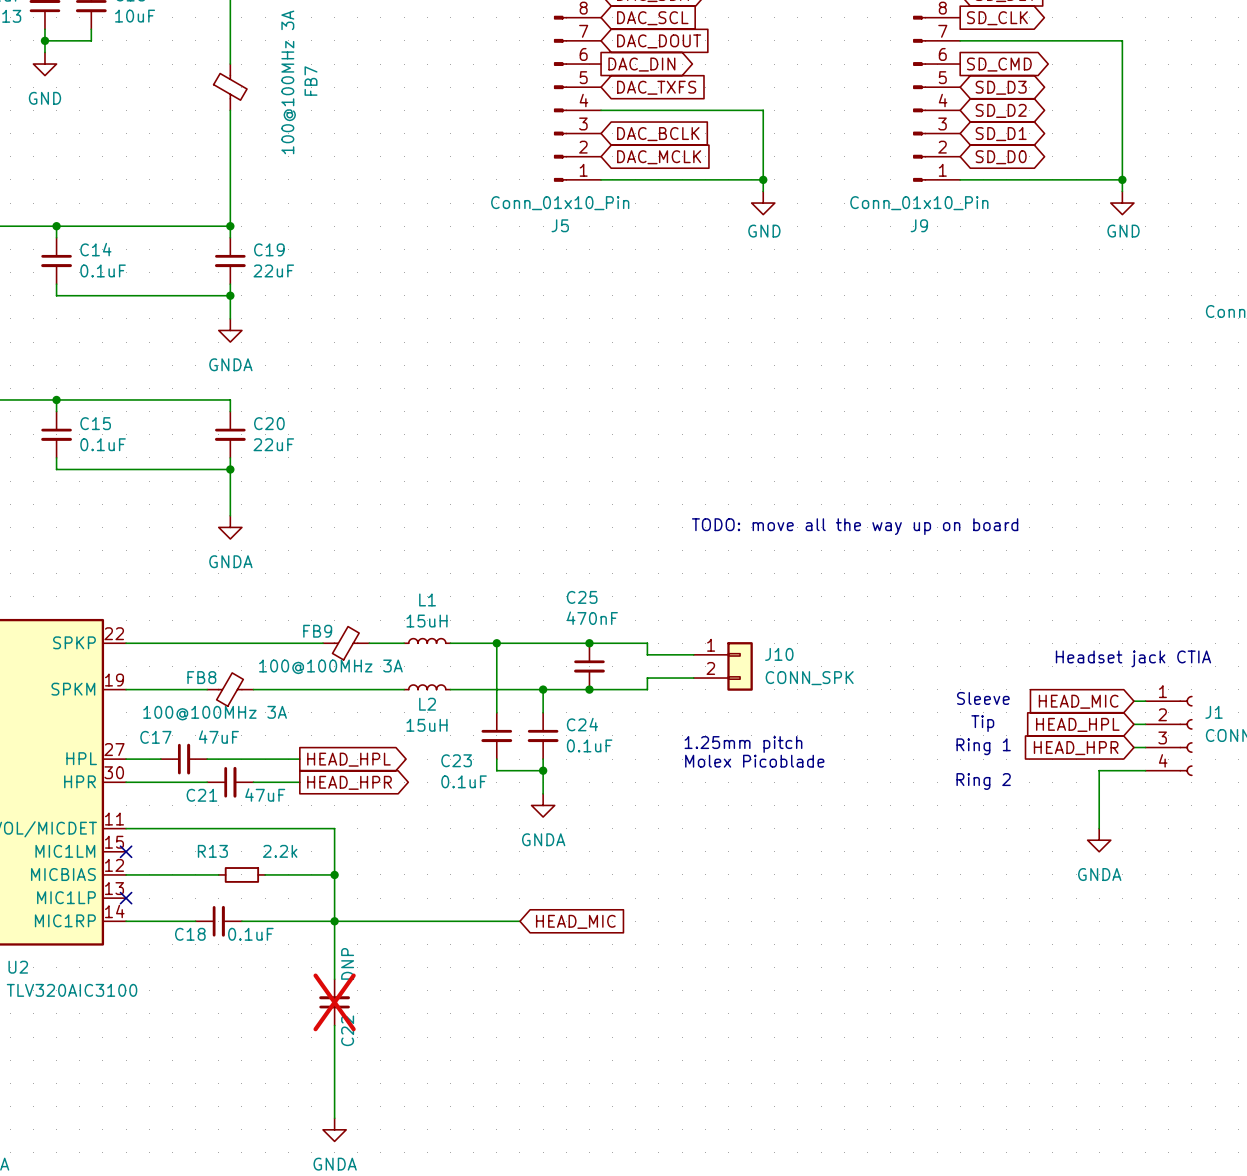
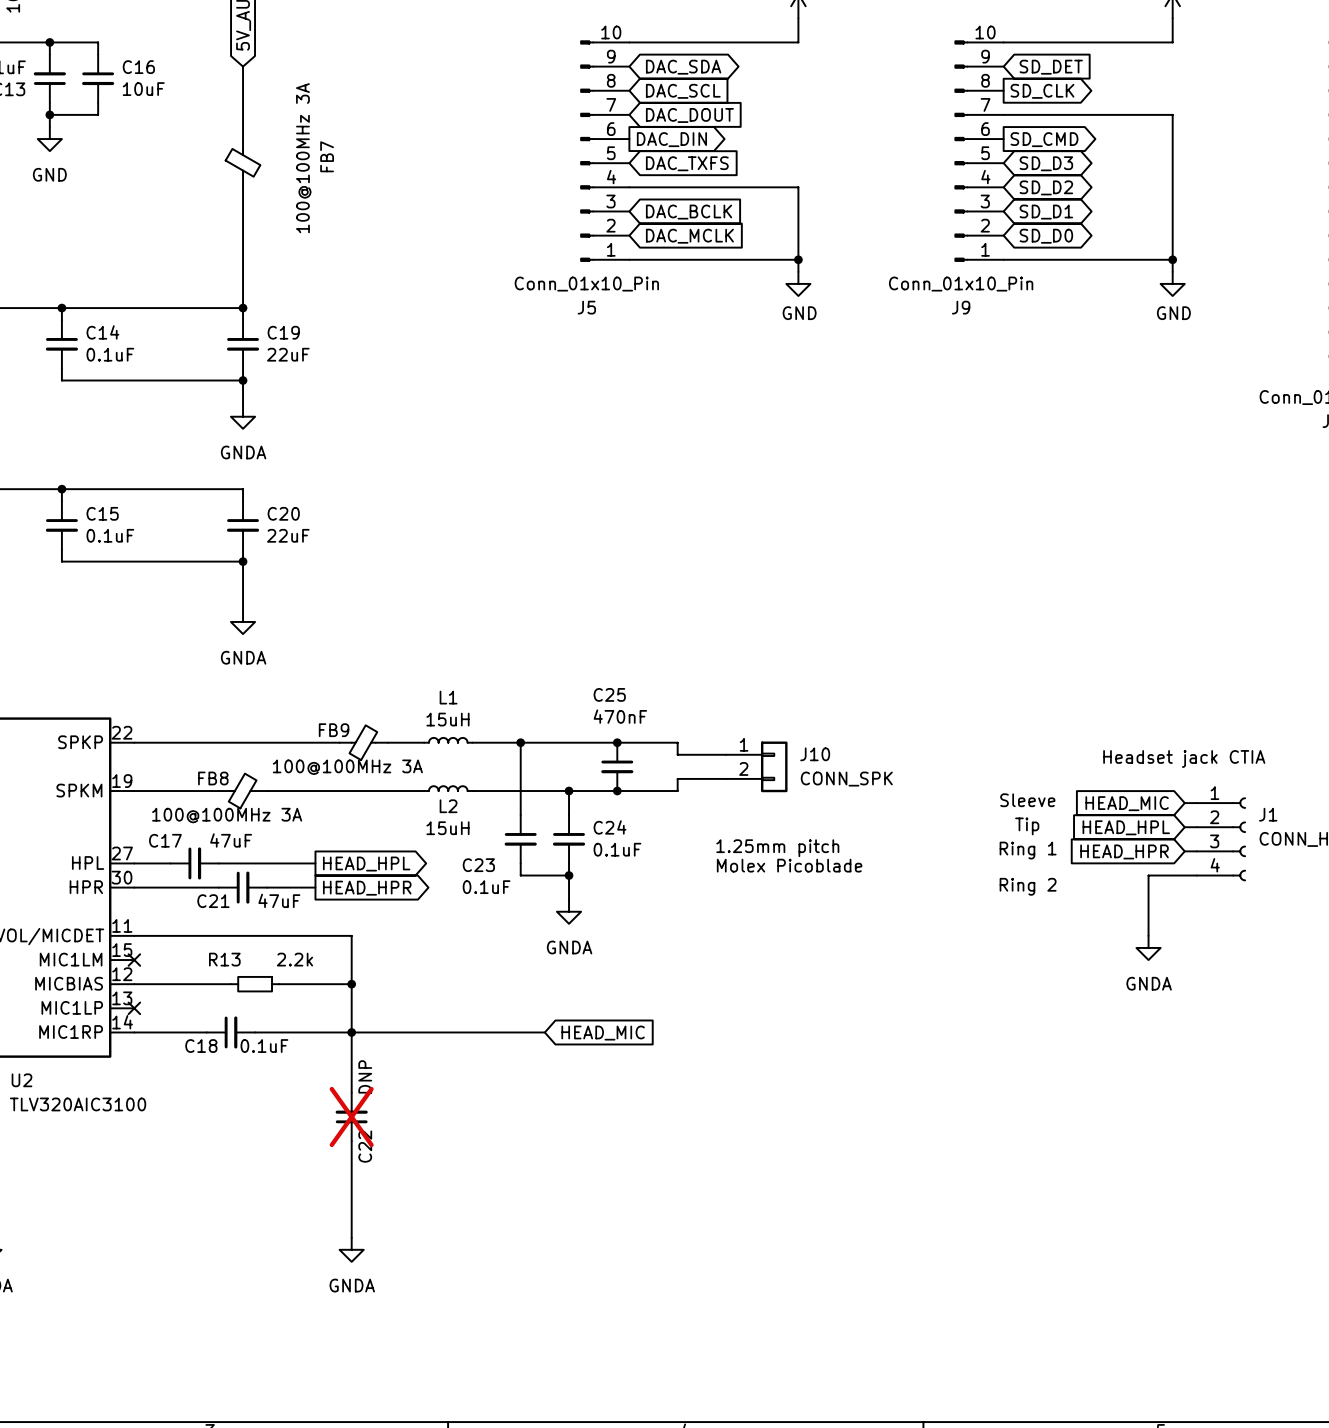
text: TODO: move all the way up on board (855, 526) -> none

